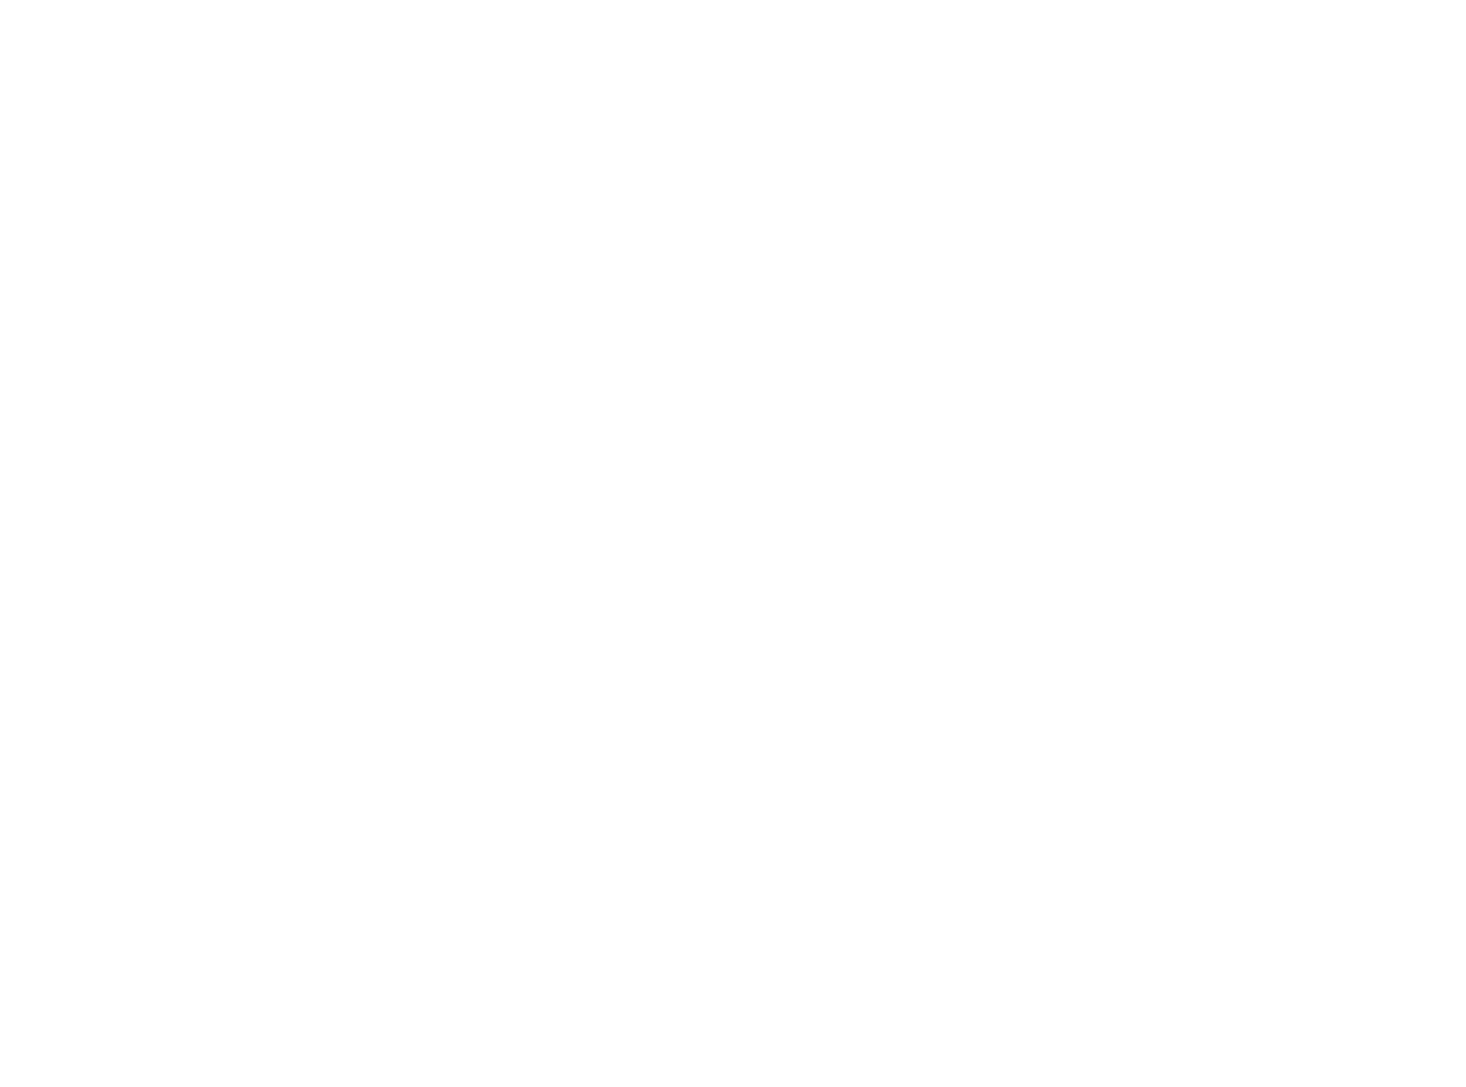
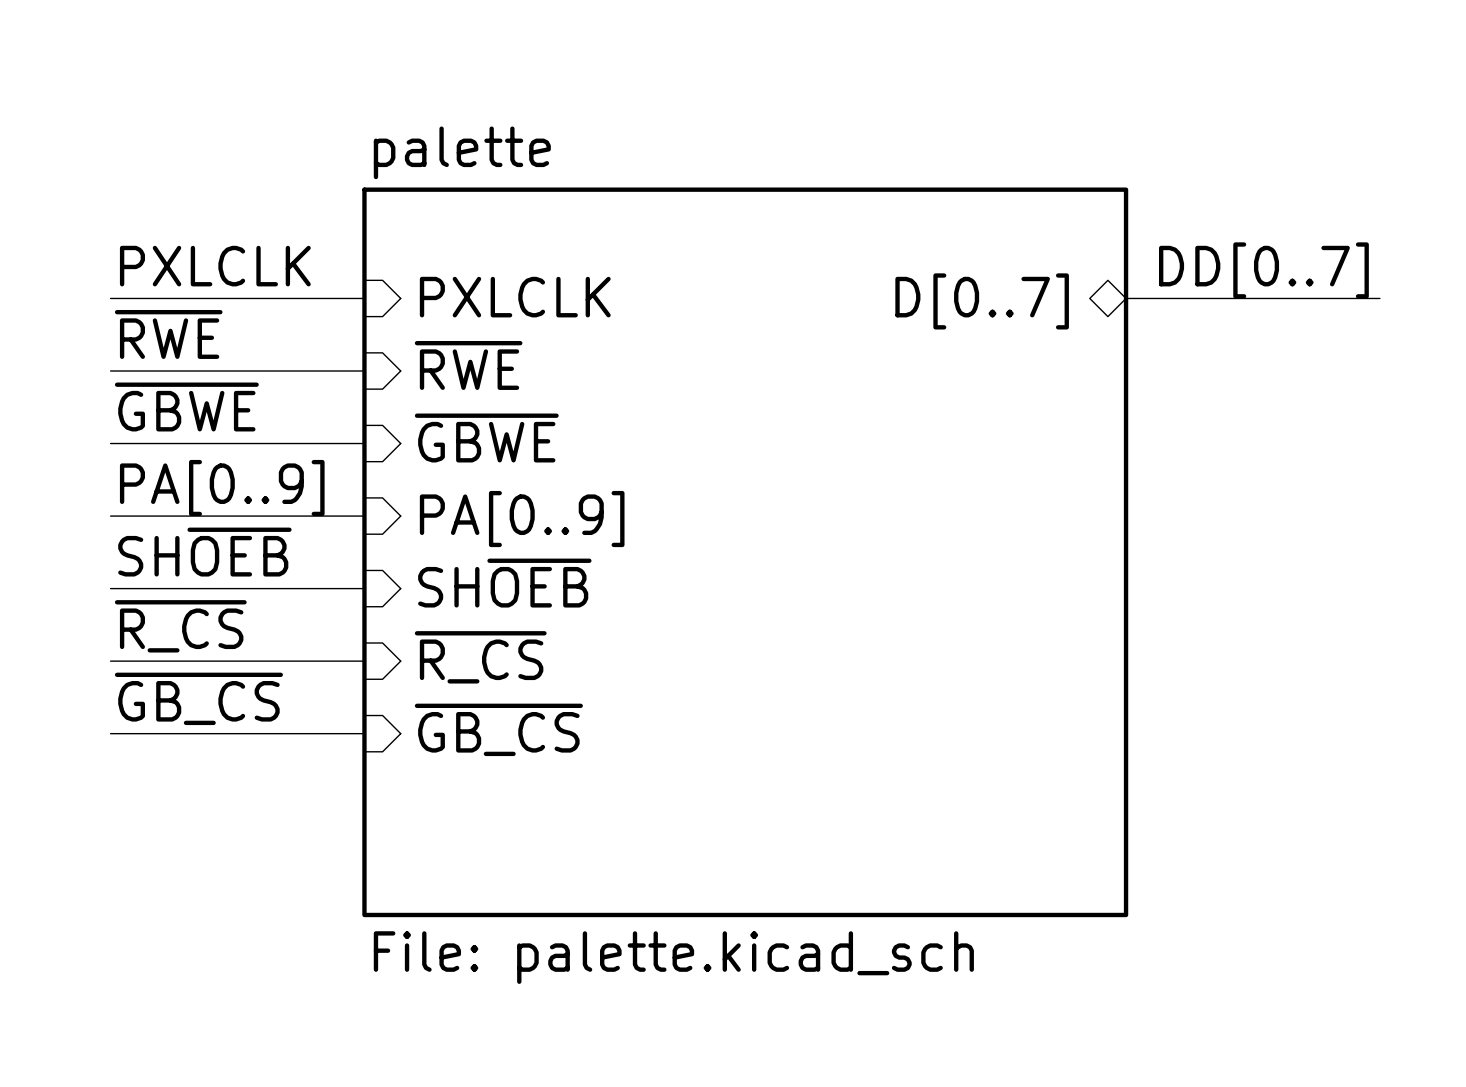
label: none -> PXLCLK (215, 266)
label: none -> DD[0..7] (1263, 270)
sheet pin: none -> PXLCLK (515, 297)
wire: none -> (110, 298) (364, 298)
bus: none -> (1126, 298) (1379, 298)
sheet pin: none -> D[0..7] (982, 301)
label: none -> ~{RWE} (168, 334)
sheet pin: none -> ~{RWE} (468, 365)
wire: none -> (110, 371) (364, 371)
label: none -> ~{GBWE} (186, 407)
sheet pin: none -> ~{GBWE} (486, 438)
wire: none -> (110, 443) (364, 443)
label: none -> PA[0..9] (222, 488)
bus: none -> (110, 516) (364, 516)
sheet pin: none -> PA[0..9] (522, 519)
label: none -> SH~{OEB} (204, 552)
sheet palette: none -> File: palette.kicad_sch (745, 552)
sheet pin: none -> SH~{OEB} (504, 583)
wire: none -> (110, 588) (364, 588)
label: none -> ~{R_CS} (180, 626)
sheet pin: none -> ~{R_CS} (480, 657)
wire: none -> (110, 661) (364, 661)
label: none -> ~{GB_CS} (198, 698)
sheet pin: none -> ~{GB_CS} (498, 729)
wire: none -> (110, 733) (364, 733)

